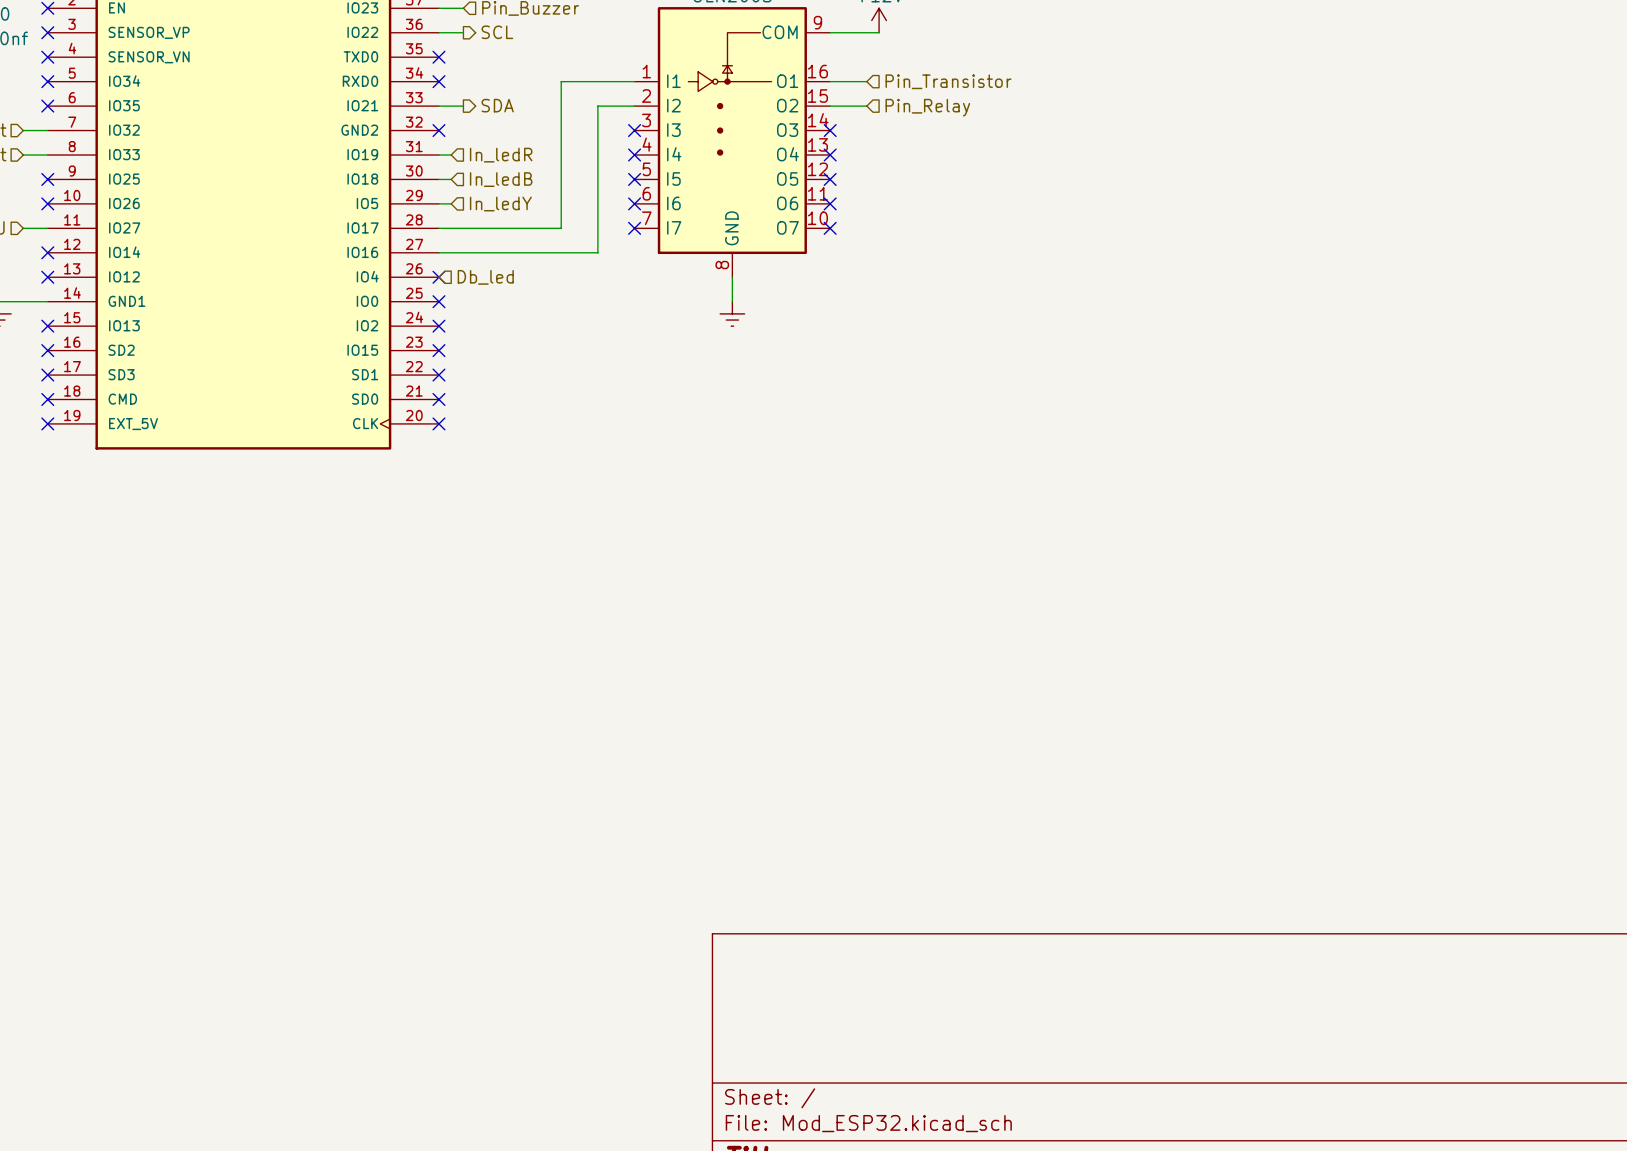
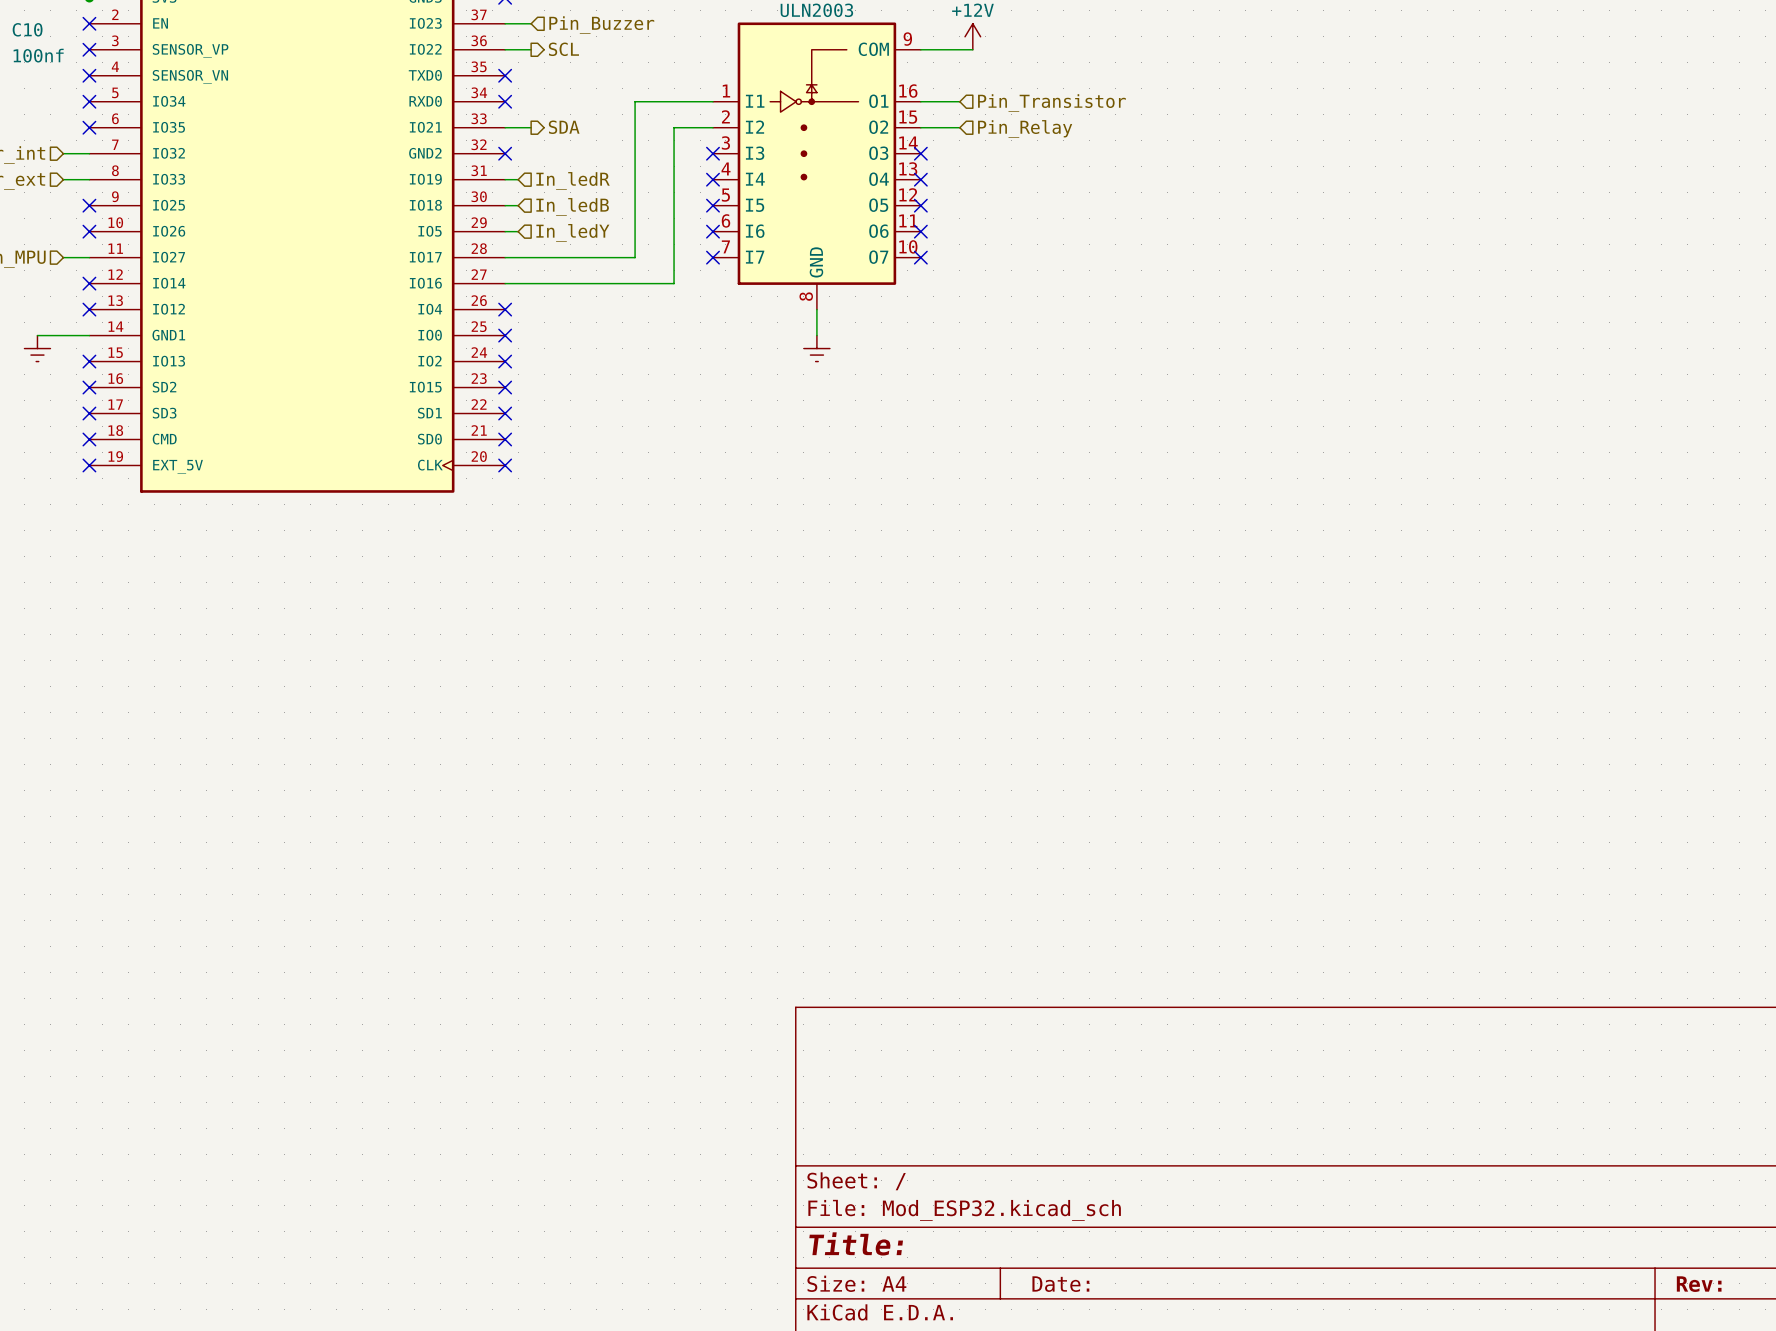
hierarchical label: Db_led (485, 277) -> none

